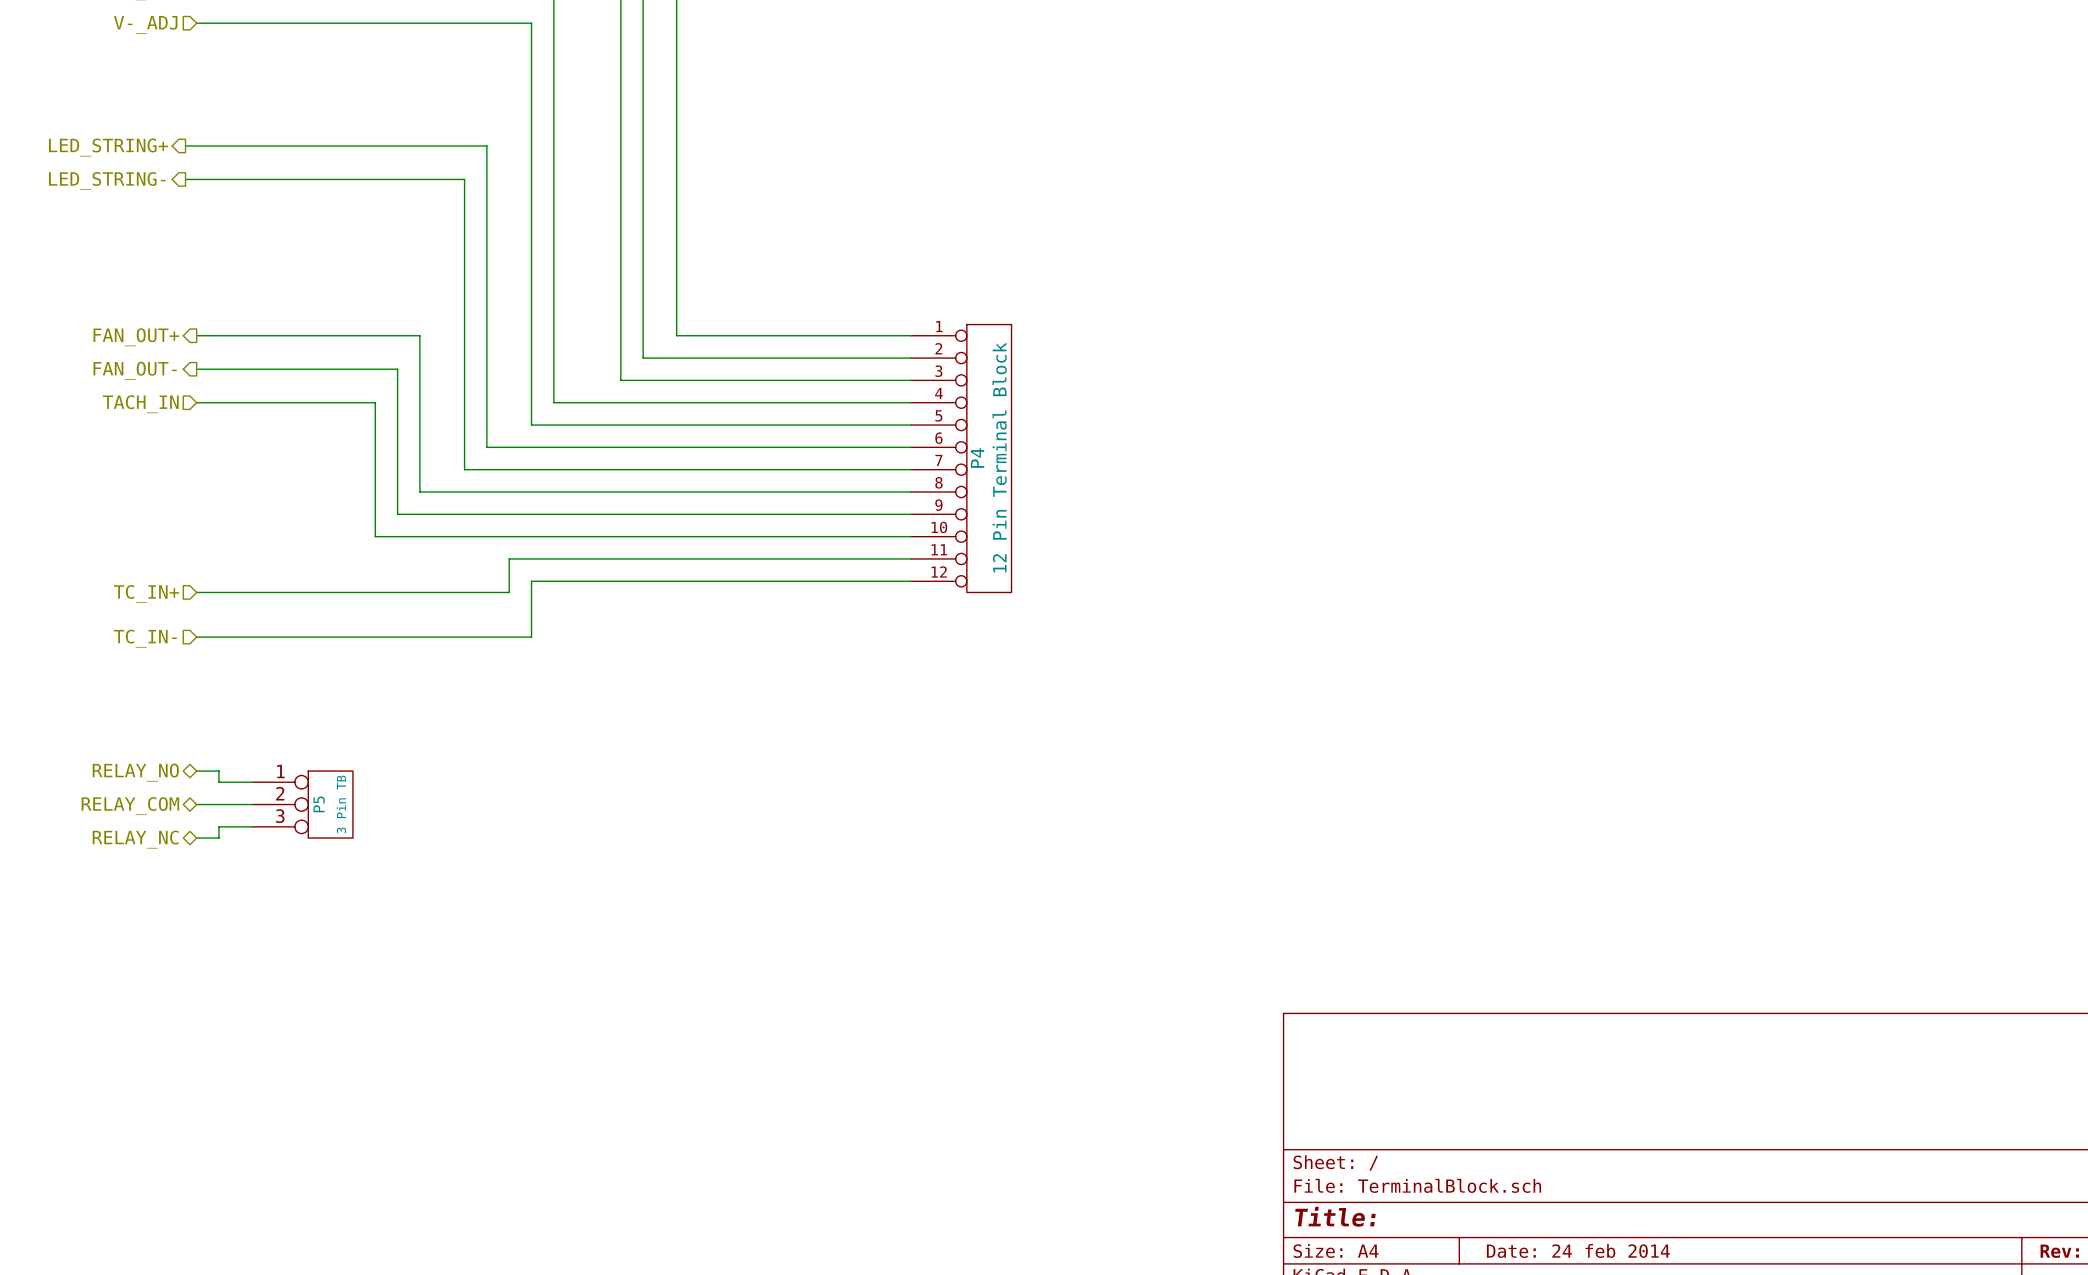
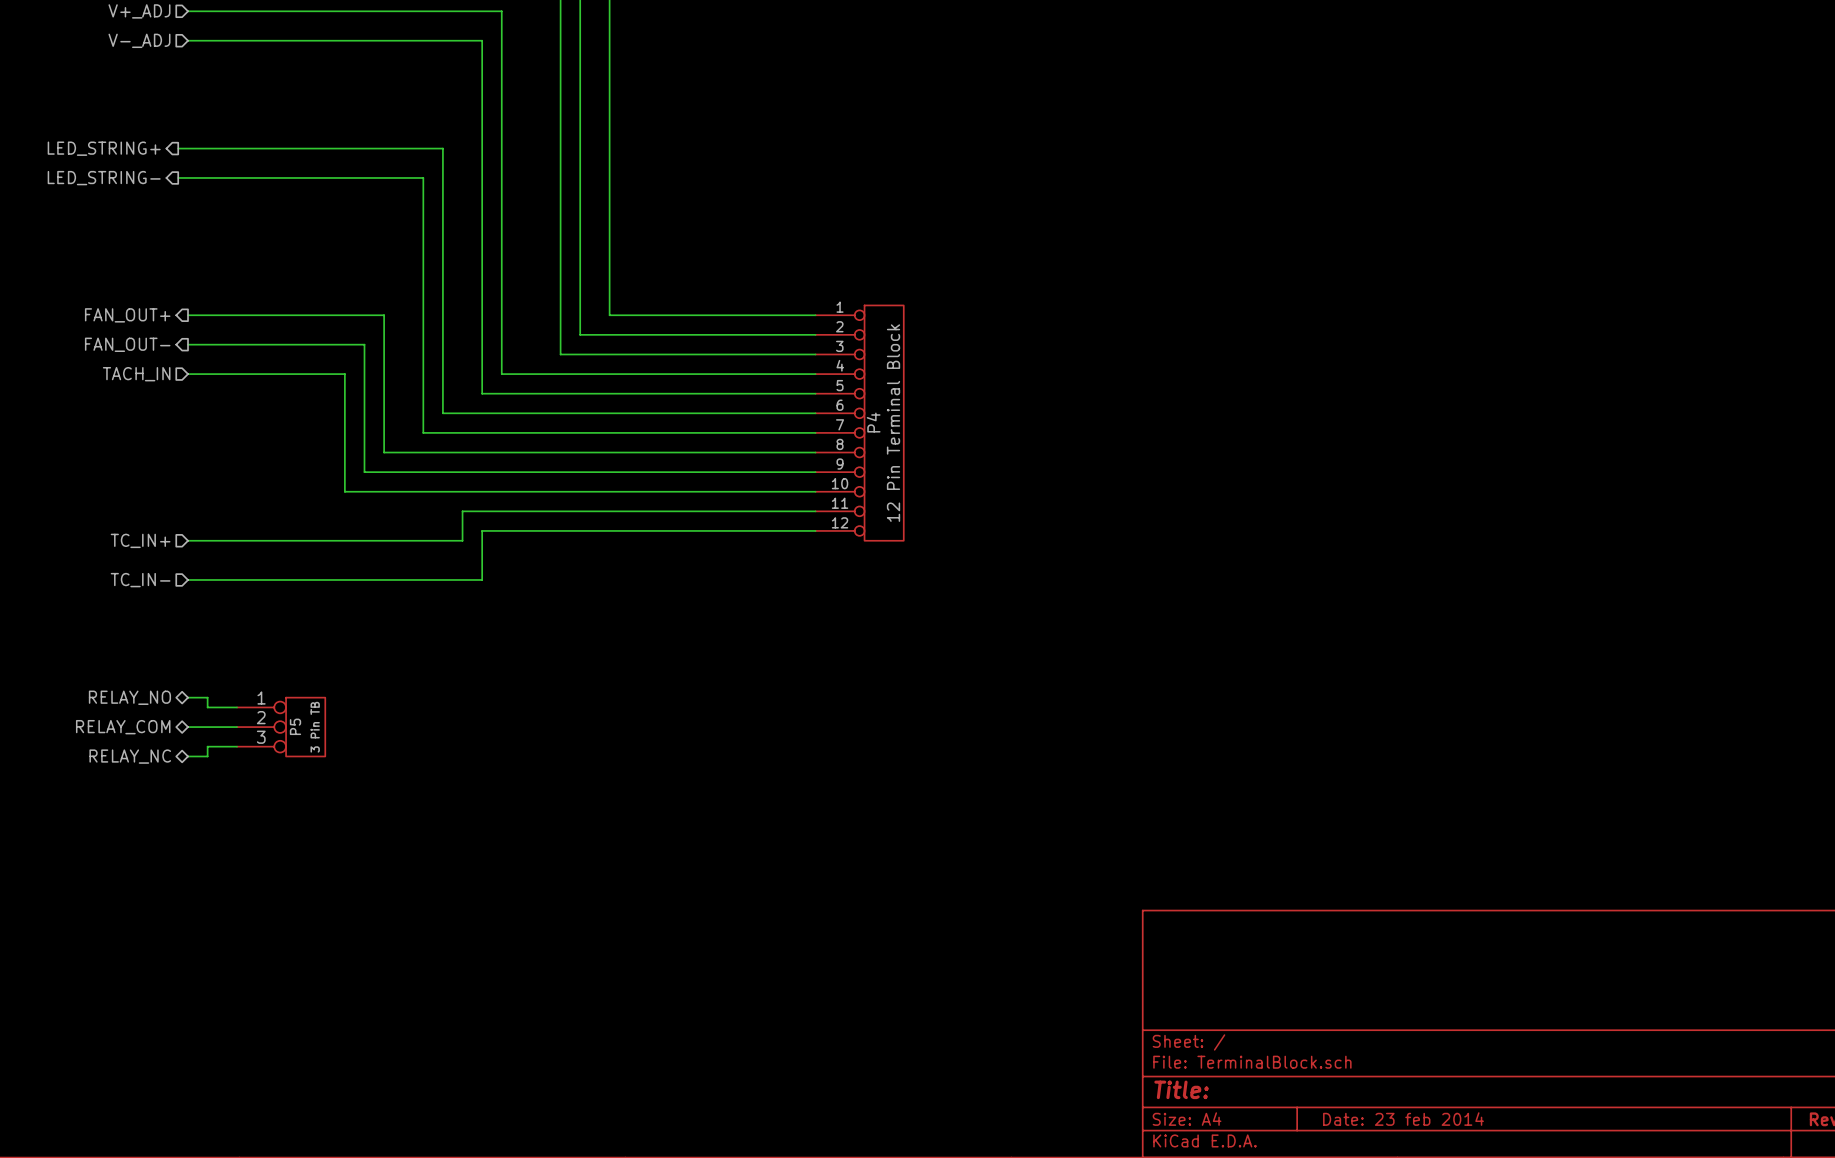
title block: Date: 24 feb 2014 (1578, 1250) -> Date: 23 feb 2014 (1403, 1119)

